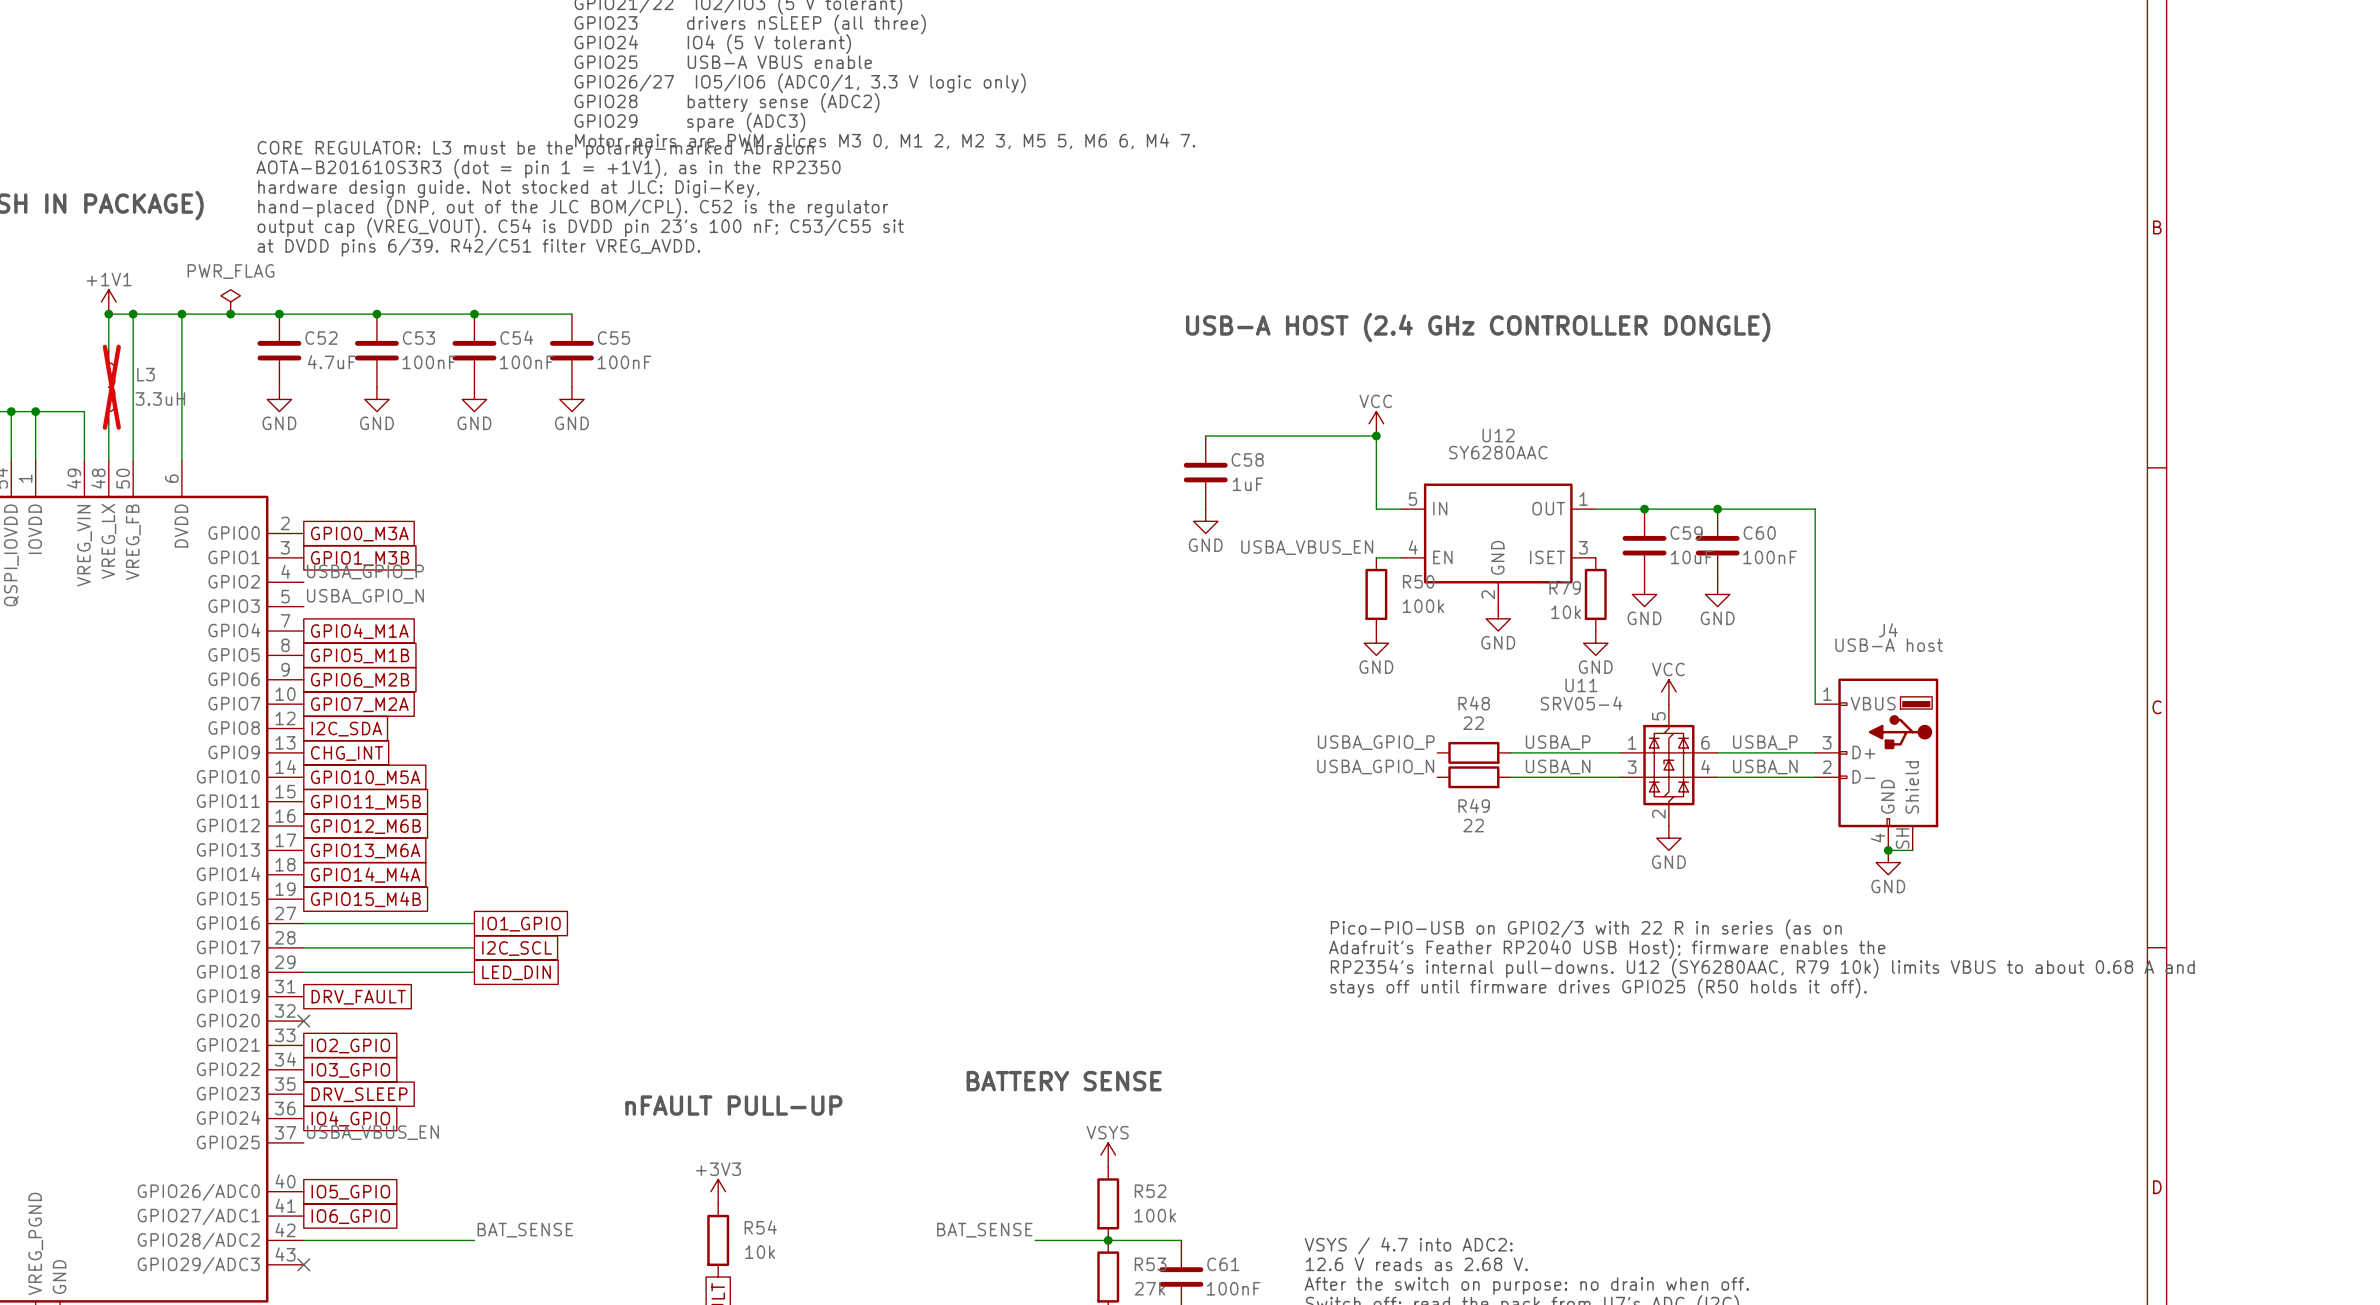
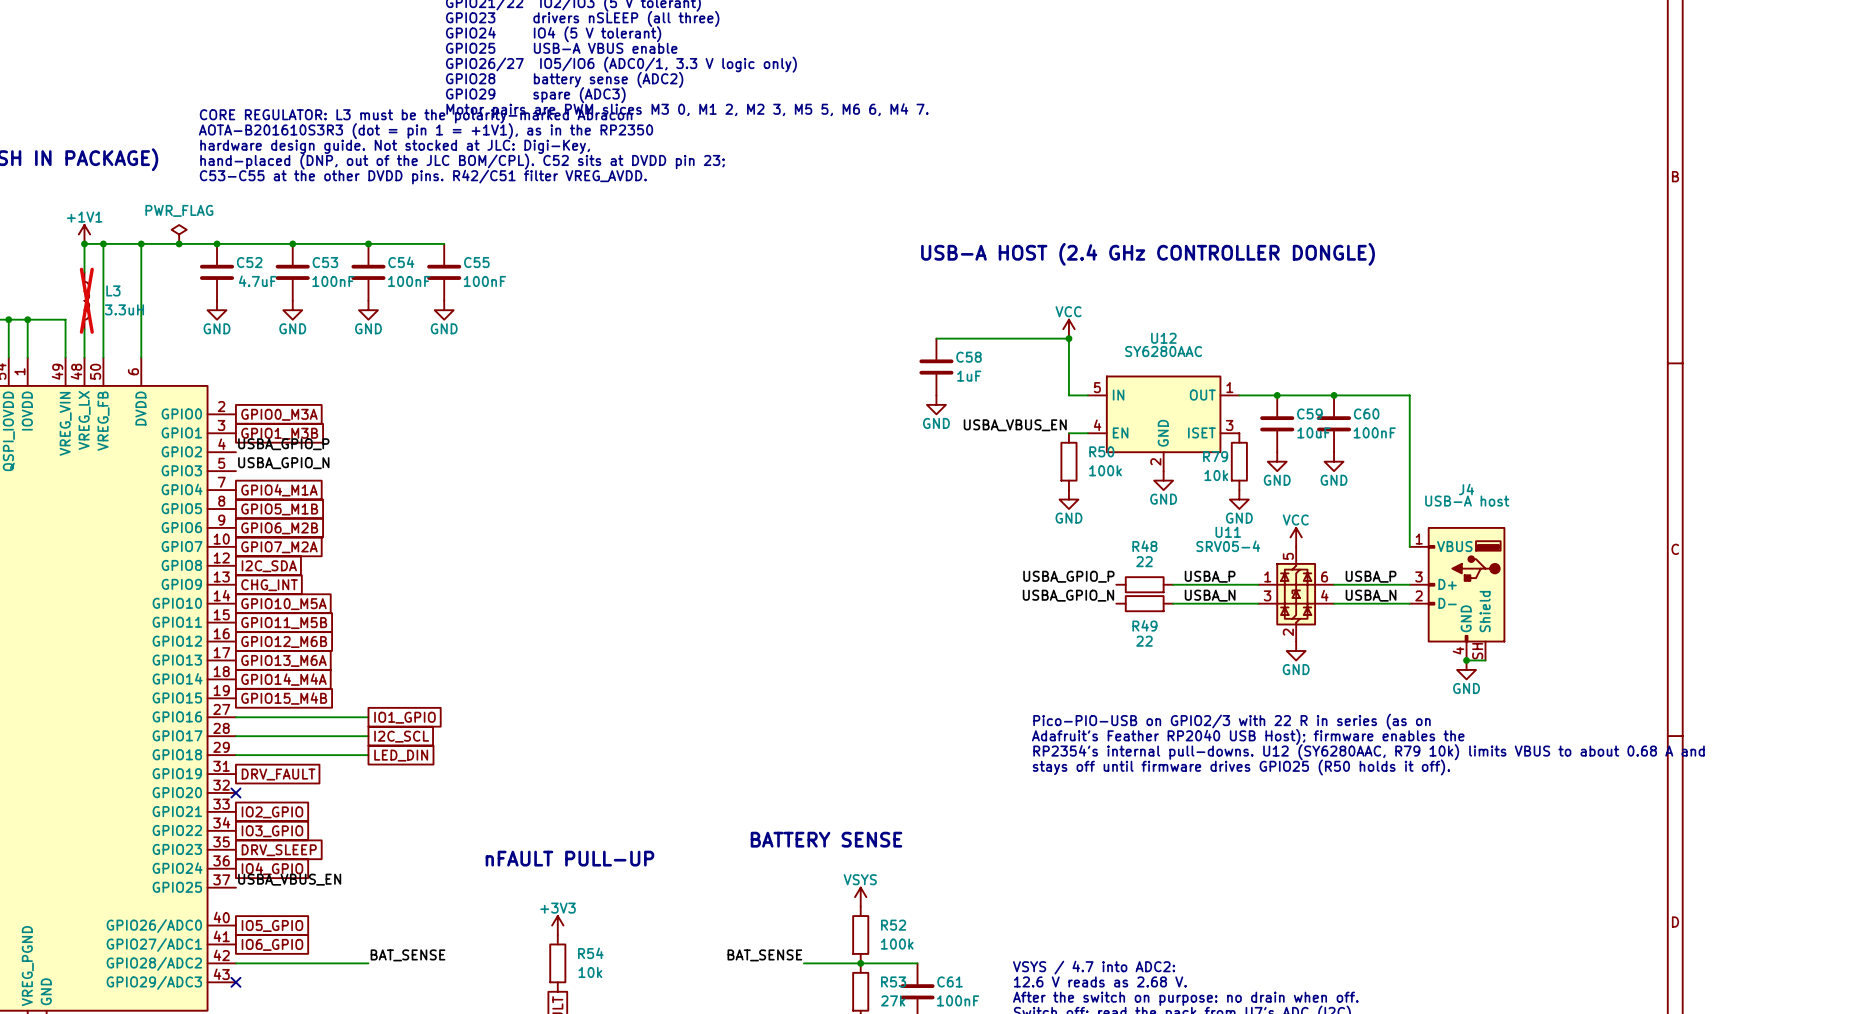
text: hand-placed (DNP, out of the JLC BOM/CPL). C52 is the regulator (573, 208) -> hand-placed (DNP, out of the JLC BOM/CPL). C52 sits at DVDD pin 23; (462, 161)
text: output cap (VREG_VOUT). C54 is DVDD pin 23's 100 nF; C53/C55 sit (580, 227) -> C53-C55 at the other DVDD pins. R42/C51 filter VREG_AVDD. (423, 177)
text: at DVDD pins 6/39. R42/C51 filter VREG_AVDD. (478, 247) -> none

